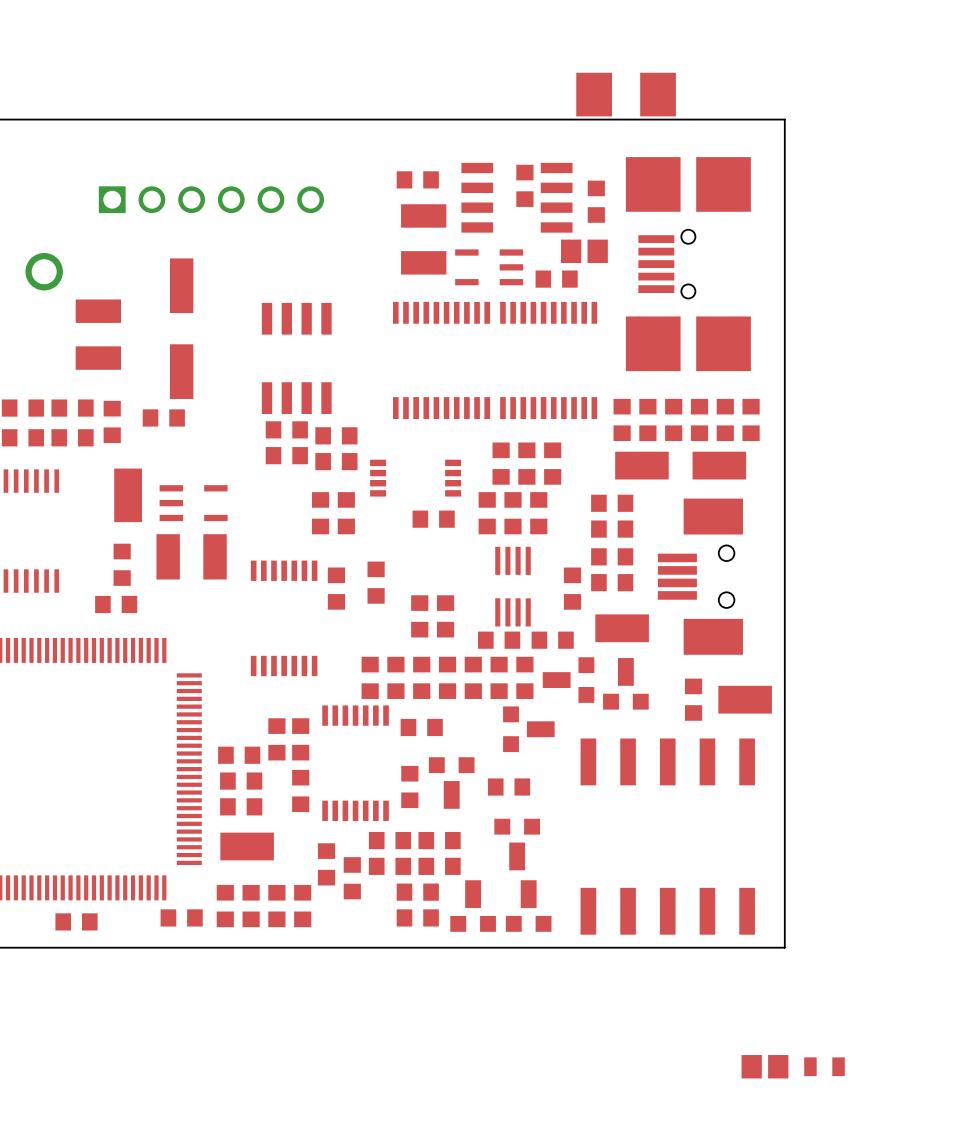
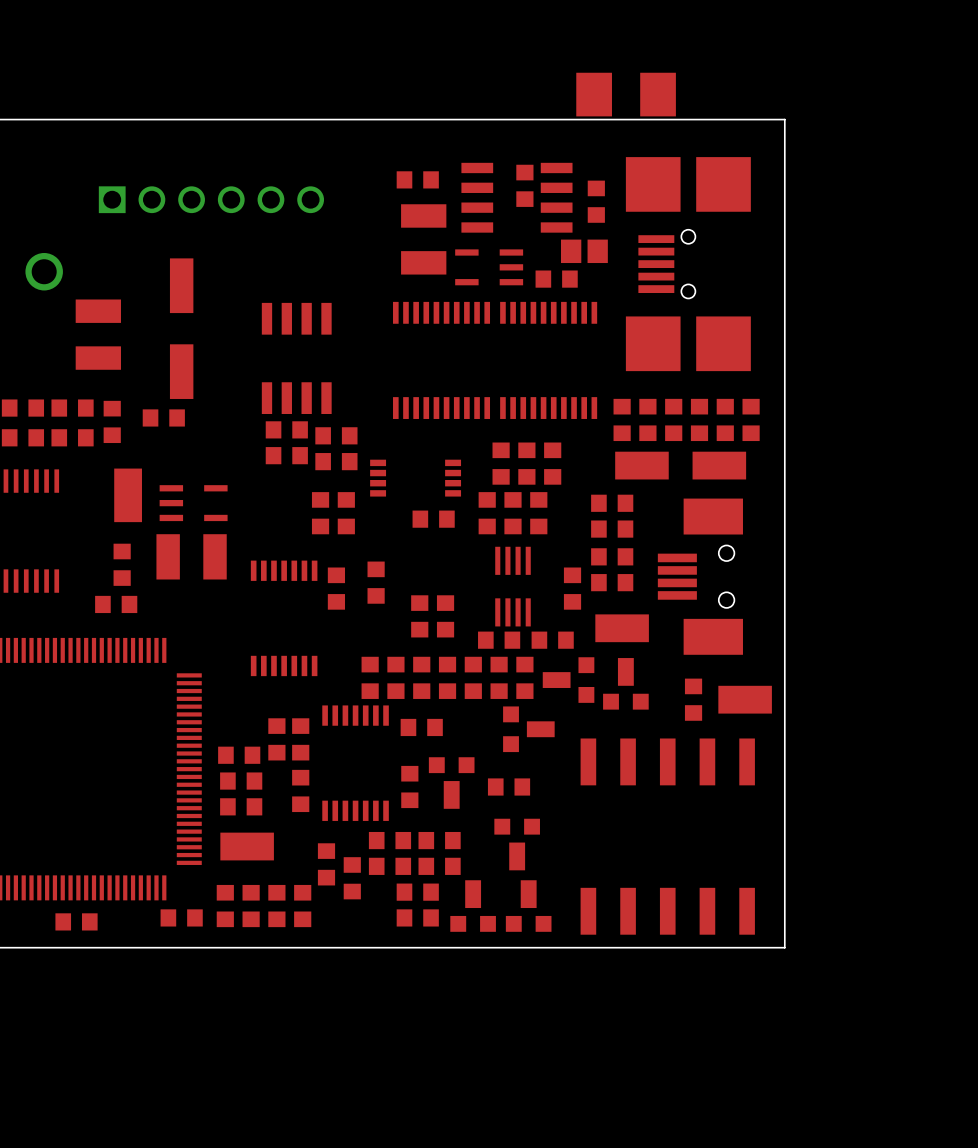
part: (764, 1066) -> none
part: (824, 1066) -> none

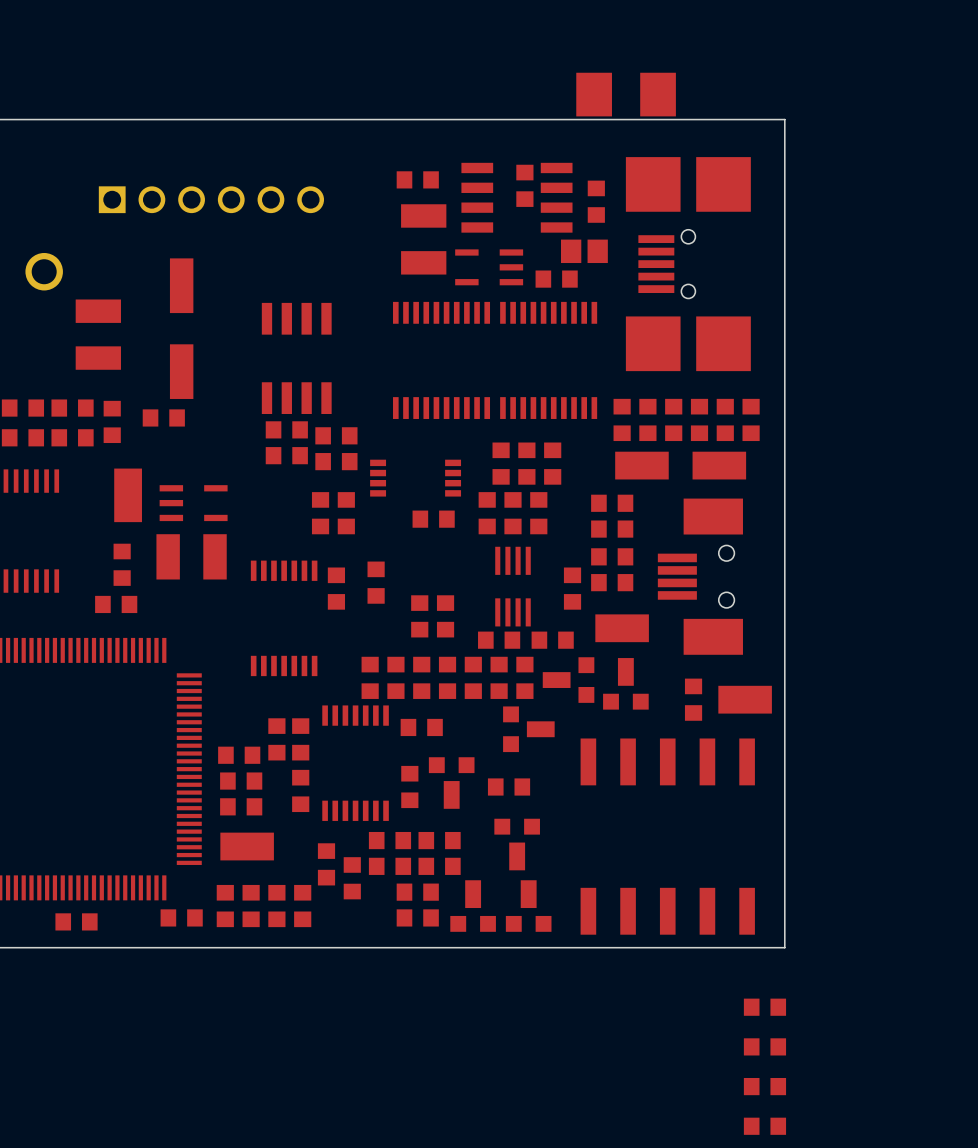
part: none -> (764, 1007)
part: none -> (764, 1046)
part: none -> (764, 1086)
part: none -> (764, 1126)

